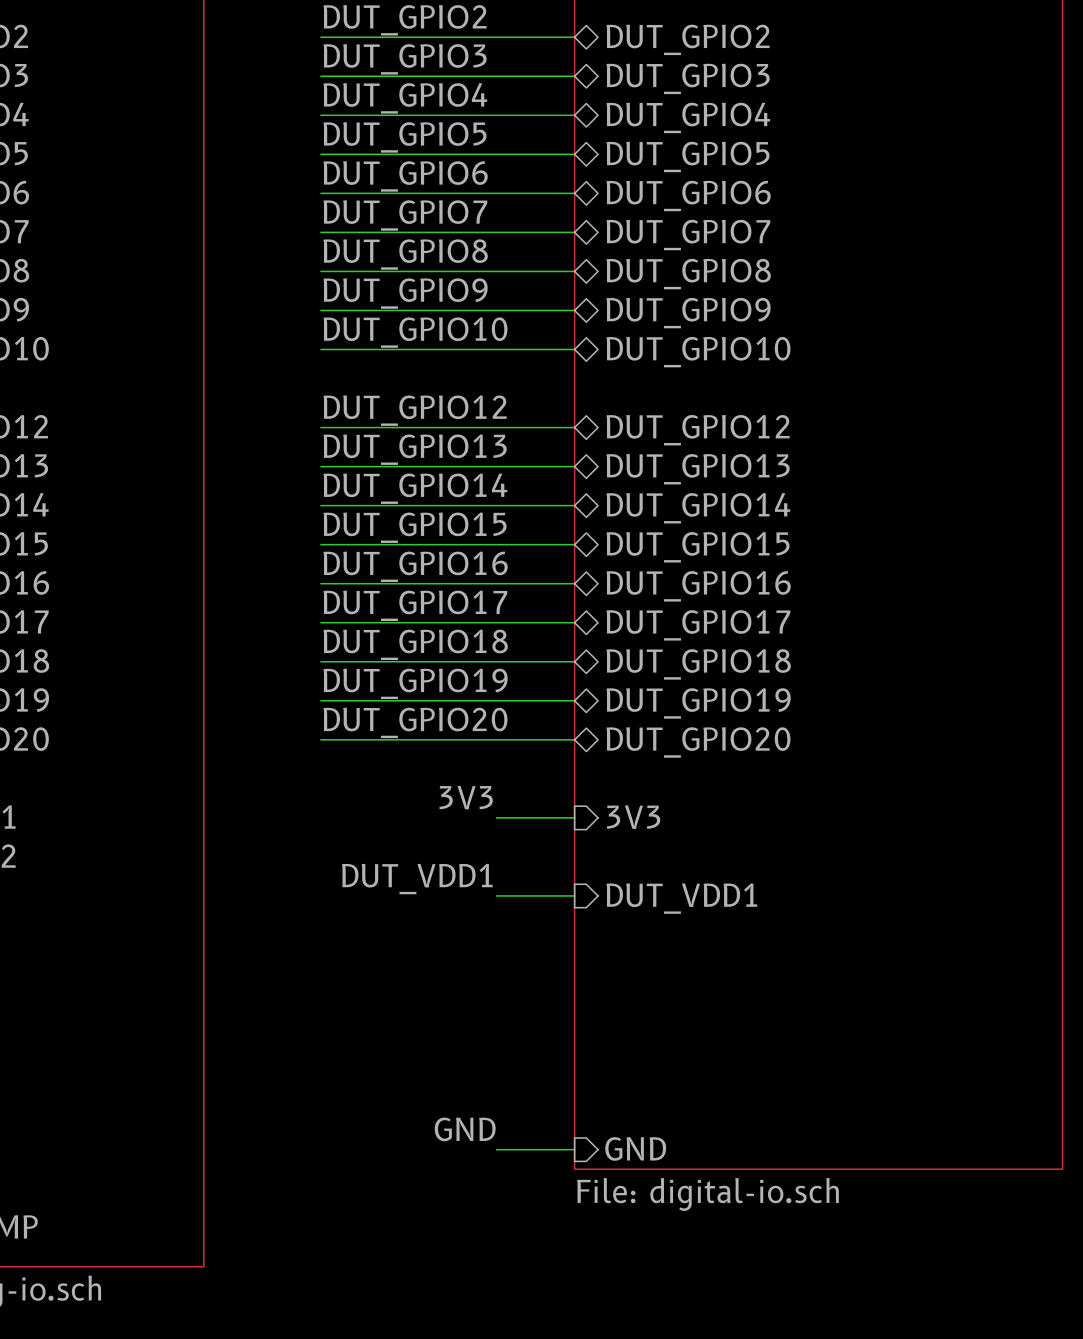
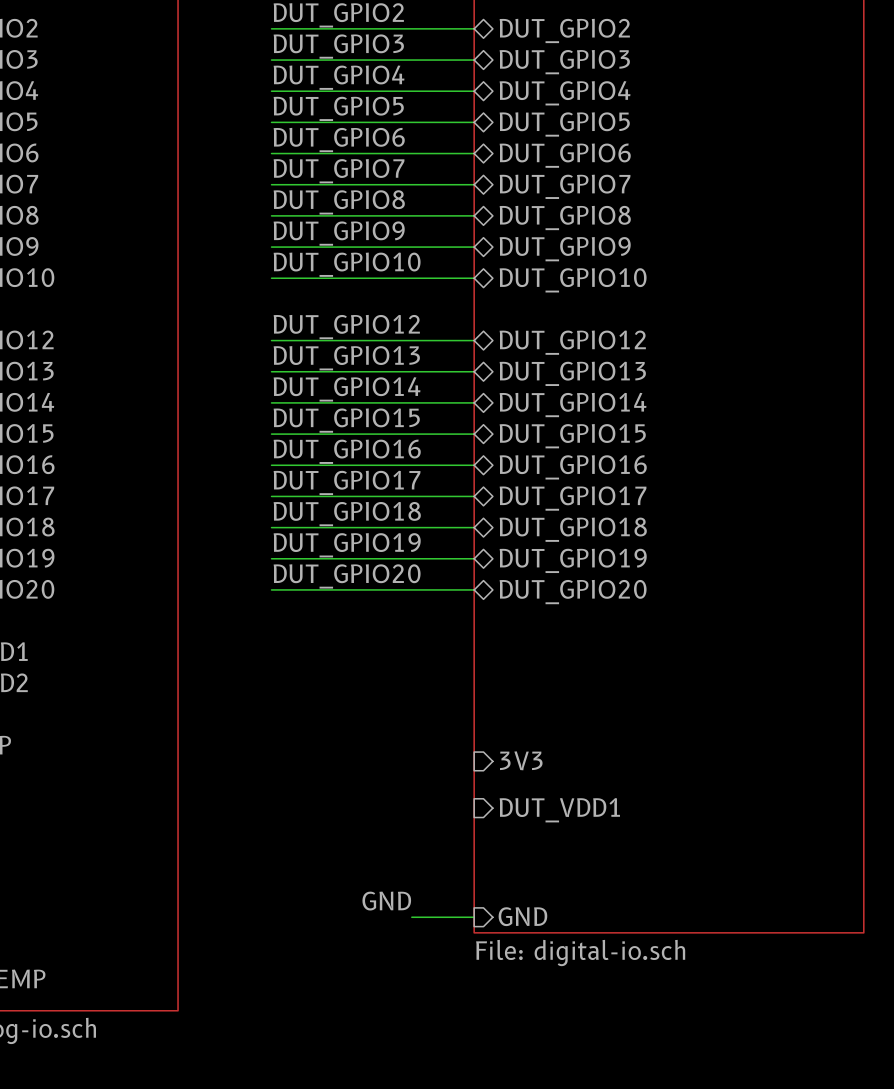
label: 3V3 (466, 797) -> none
wire: (496, 817) (574, 817) -> none
sheet pin position: 3V3 (633, 817) -> 3V3 (521, 760)
label: DUT_VDD1 (417, 879) -> none
wire: (496, 895) (574, 895) -> none
sheet pin position: DUT_VDD1 (681, 898) -> DUT_VDD1 (559, 810)

